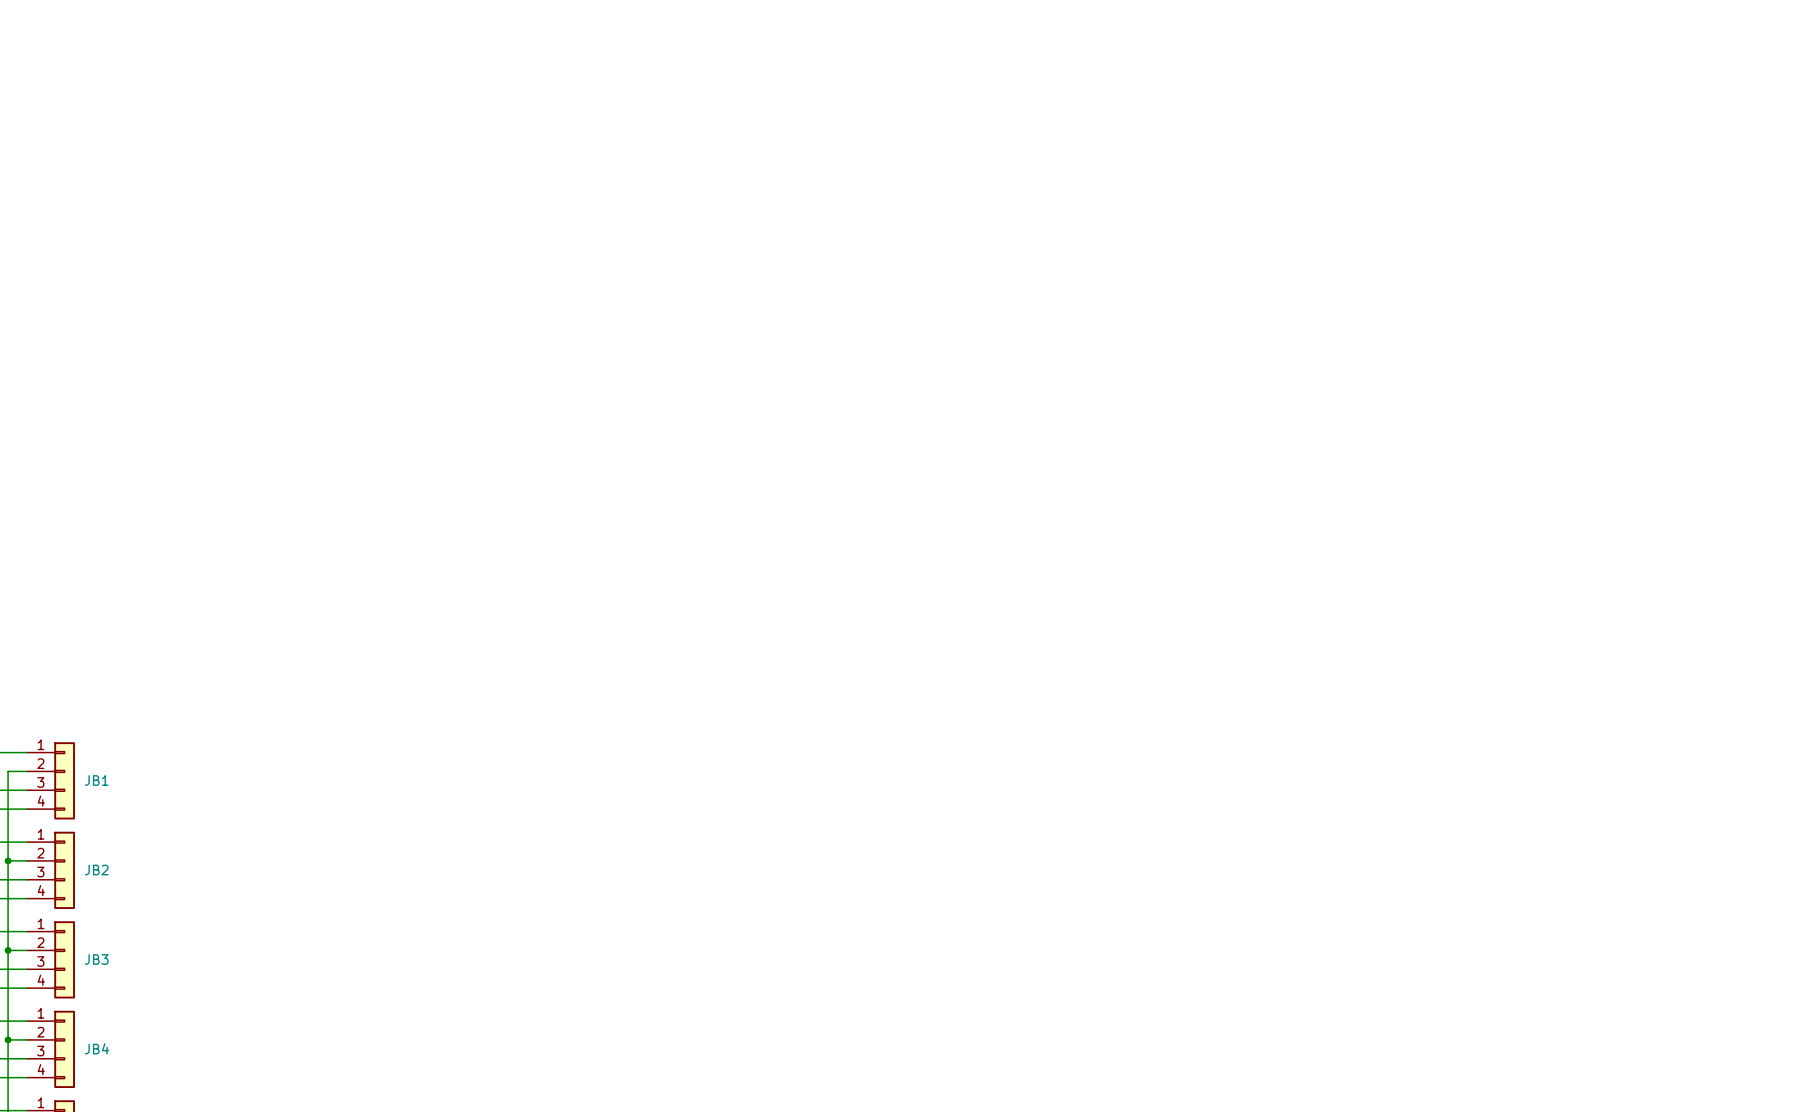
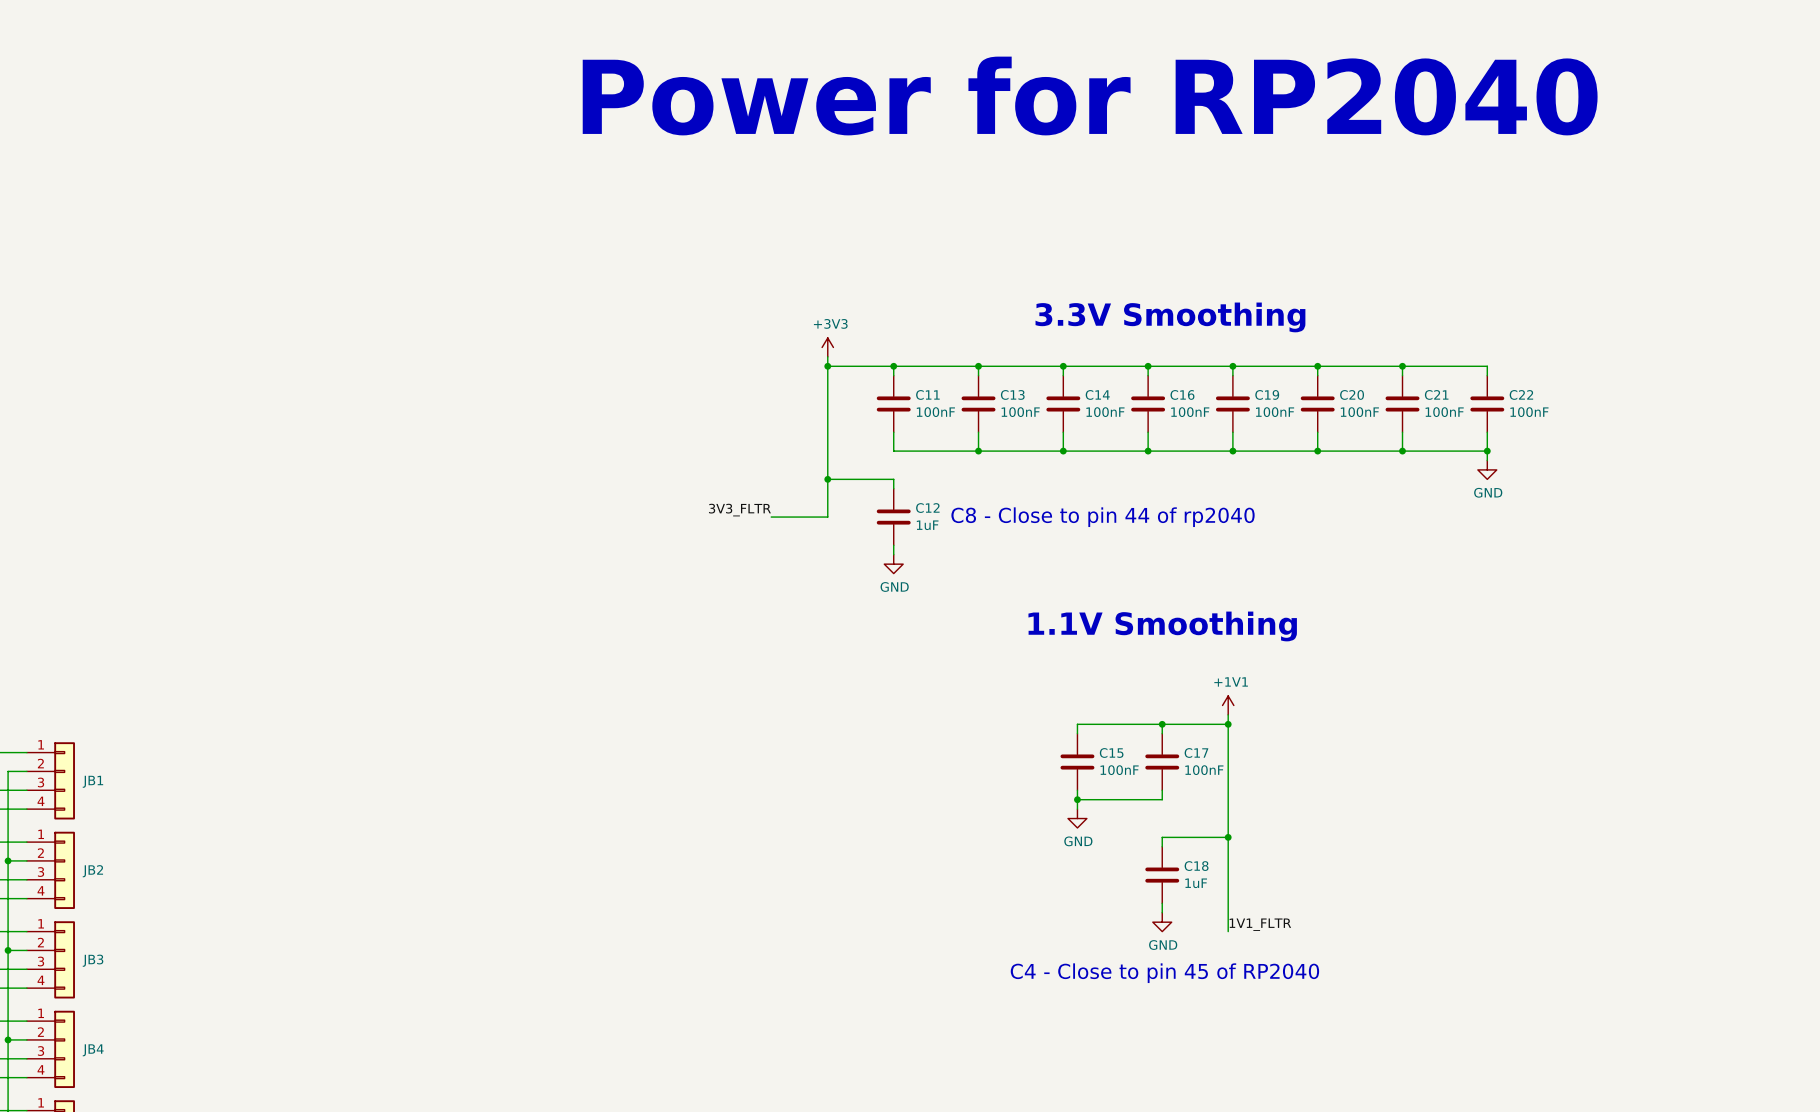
text: none -> Power for RP2040 (1090, 96)
text: none -> 3.3V Smoothing (1170, 317)
power symbol: none -> +3V3 (827, 347)
wire: none -> (827, 356) (827, 517) (771, 517)
wire: none -> (827, 366) (1487, 366) (1487, 375)
junction: none -> (827, 366)
wire: none -> (893, 366) (893, 375)
junction: none -> (893, 366)
wire: none -> (978, 366) (978, 375)
junction: none -> (978, 366)
wire: none -> (1063, 366) (1063, 375)
junction: none -> (1063, 366)
wire: none -> (1148, 366) (1148, 375)
junction: none -> (1148, 366)
wire: none -> (1232, 366) (1232, 375)
junction: none -> (1232, 366)
wire: none -> (1317, 366) (1317, 375)
junction: none -> (1317, 366)
wire: none -> (1402, 366) (1402, 375)
junction: none -> (1402, 366)
C11: none -> 100nF (893, 403)
C13: none -> 100nF (978, 403)
C14: none -> 100nF (1063, 403)
C16: none -> 100nF (1148, 403)
C19: none -> 100nF (1232, 403)
C20: none -> 100nF (1317, 403)
C21: none -> 100nF (1402, 403)
C22: none -> 100nF (1487, 403)
wire: none -> (893, 432) (893, 451) (1487, 451)
wire: none -> (978, 432) (978, 451)
wire: none -> (1063, 432) (1063, 451)
wire: none -> (1148, 432) (1148, 451)
wire: none -> (1232, 432) (1232, 451)
wire: none -> (1317, 432) (1317, 451)
wire: none -> (1402, 432) (1402, 451)
wire: none -> (1487, 432) (1487, 460)
junction: none -> (978, 451)
junction: none -> (1063, 451)
junction: none -> (1148, 451)
junction: none -> (1232, 451)
junction: none -> (1317, 451)
junction: none -> (1402, 451)
junction: none -> (1487, 451)
power symbol: none -> GND (1487, 469)
wire: none -> (827, 479) (893, 479) (893, 488)
junction: none -> (827, 479)
label: none -> 3V3_FLTR (739, 510)
C12: none -> 1uF (893, 517)
text: none -> C8 - Close to pin 44 of rp2040 (1103, 517)
wire: none -> (893, 545) (893, 554)
power symbol: none -> GND (893, 564)
text: none -> 1.1V Smoothing (1162, 626)
power symbol: none -> +1V1 (1228, 705)
wire: none -> (1228, 714) (1228, 931)
wire: none -> (1162, 724) (1162, 733)
junction: none -> (1162, 724)
wire: none -> (1228, 724) (1077, 724) (1077, 733)
junction: none -> (1228, 724)
C15: none -> 100nF (1077, 762)
C17: none -> 100nF (1162, 762)
wire: none -> (1077, 790) (1077, 809)
wire: none -> (1162, 790) (1162, 799) (1077, 799)
junction: none -> (1077, 799)
power symbol: none -> GND (1077, 818)
wire: none -> (1228, 837) (1162, 837) (1162, 846)
junction: none -> (1228, 837)
C18: none -> 1uF (1162, 875)
wire: none -> (1162, 903) (1162, 912)
power symbol: none -> GND (1162, 922)
label: none -> 1V1_FLTR (1260, 924)
text: none -> C4 - Close to pin 45 of RP2040 (1164, 973)

